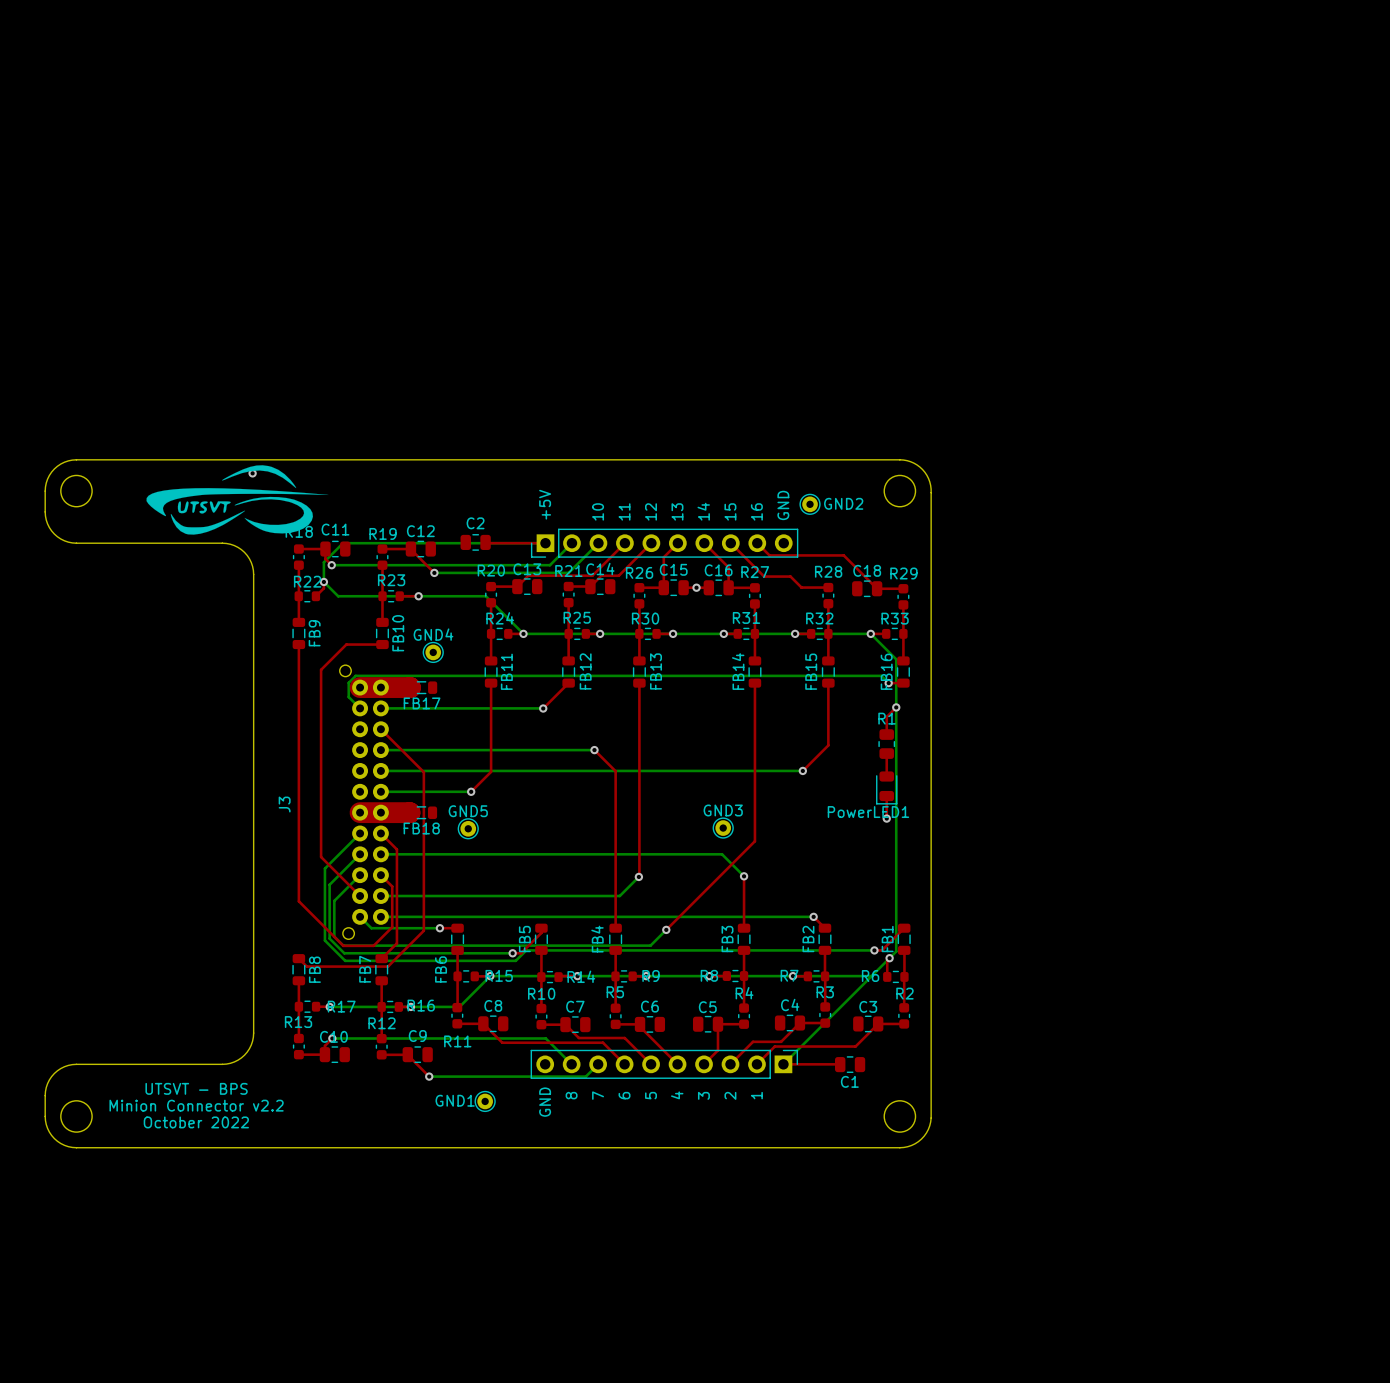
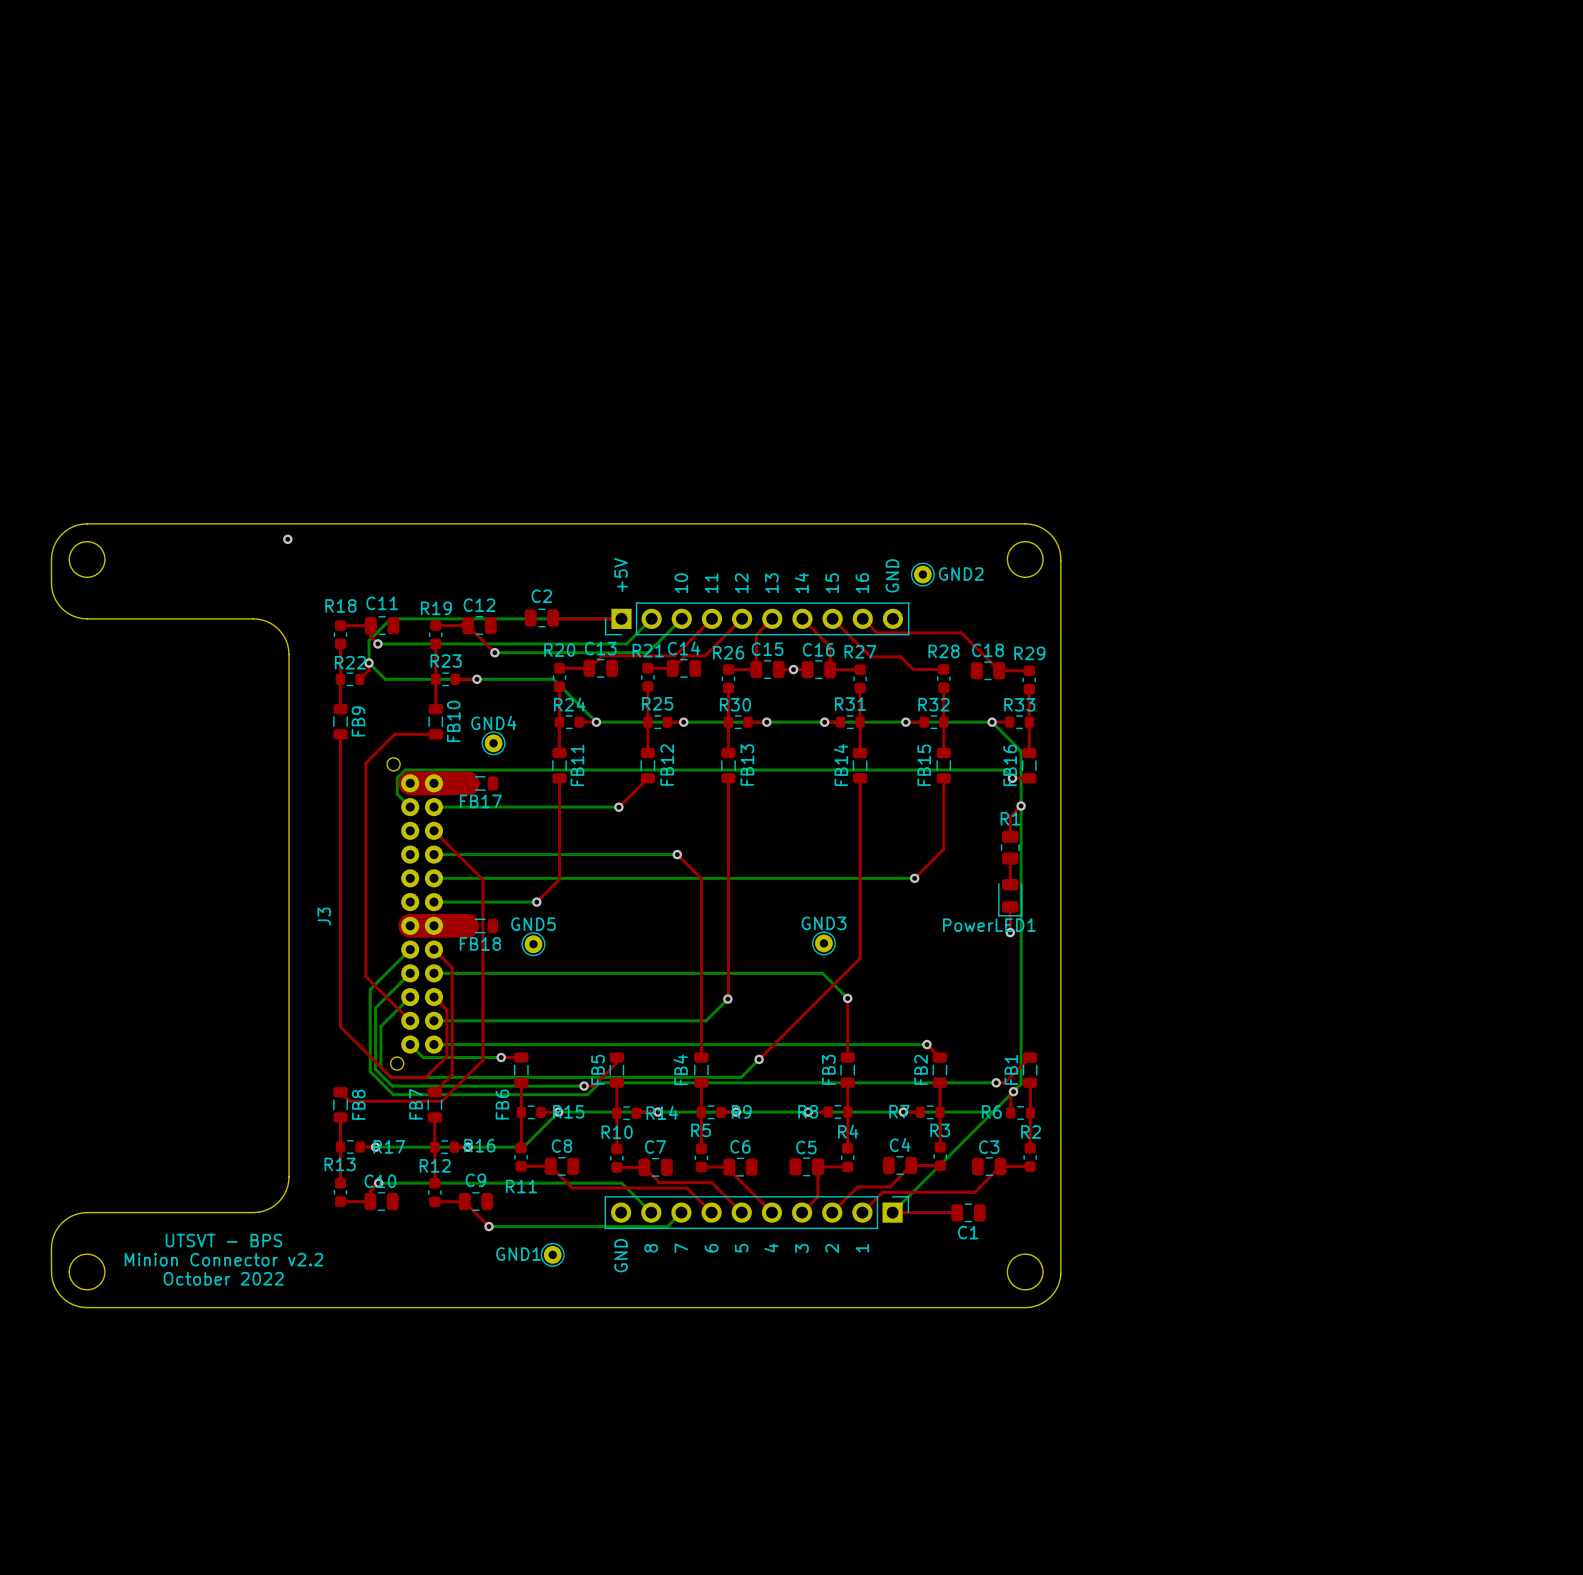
drawing: [146, 465, 329, 535] -> none

